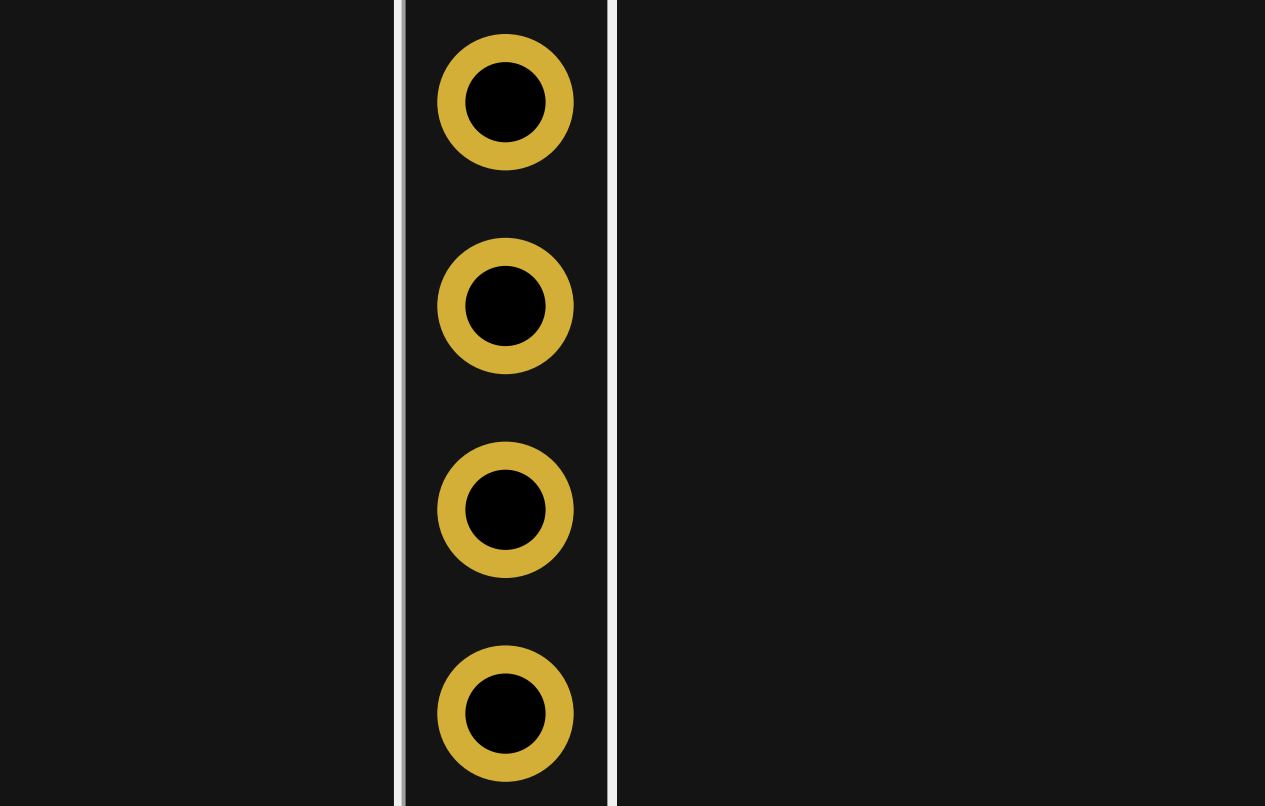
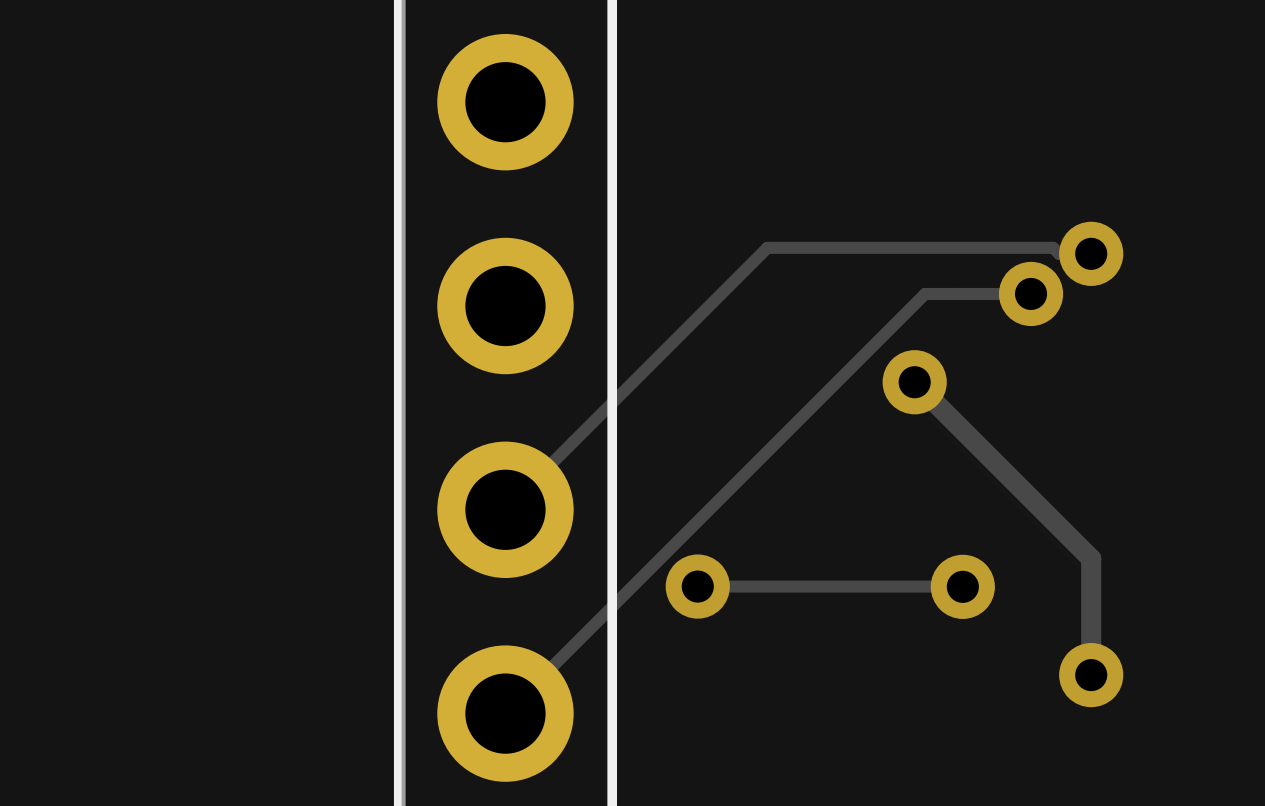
track: none -> (1091, 253) (1059, 253) (1053, 247) (767, 247) (505, 509)
via: none -> (1091, 253)
track: none -> (1031, 293) (925, 293) (505, 713)
via: none -> (1031, 293)
track: none -> (914, 382) (1091, 558) (1091, 675)
via: none -> (914, 382)
via: none -> (697, 586)
track: none -> (962, 586) (697, 586)
via: none -> (962, 586)
via: none -> (1091, 675)

